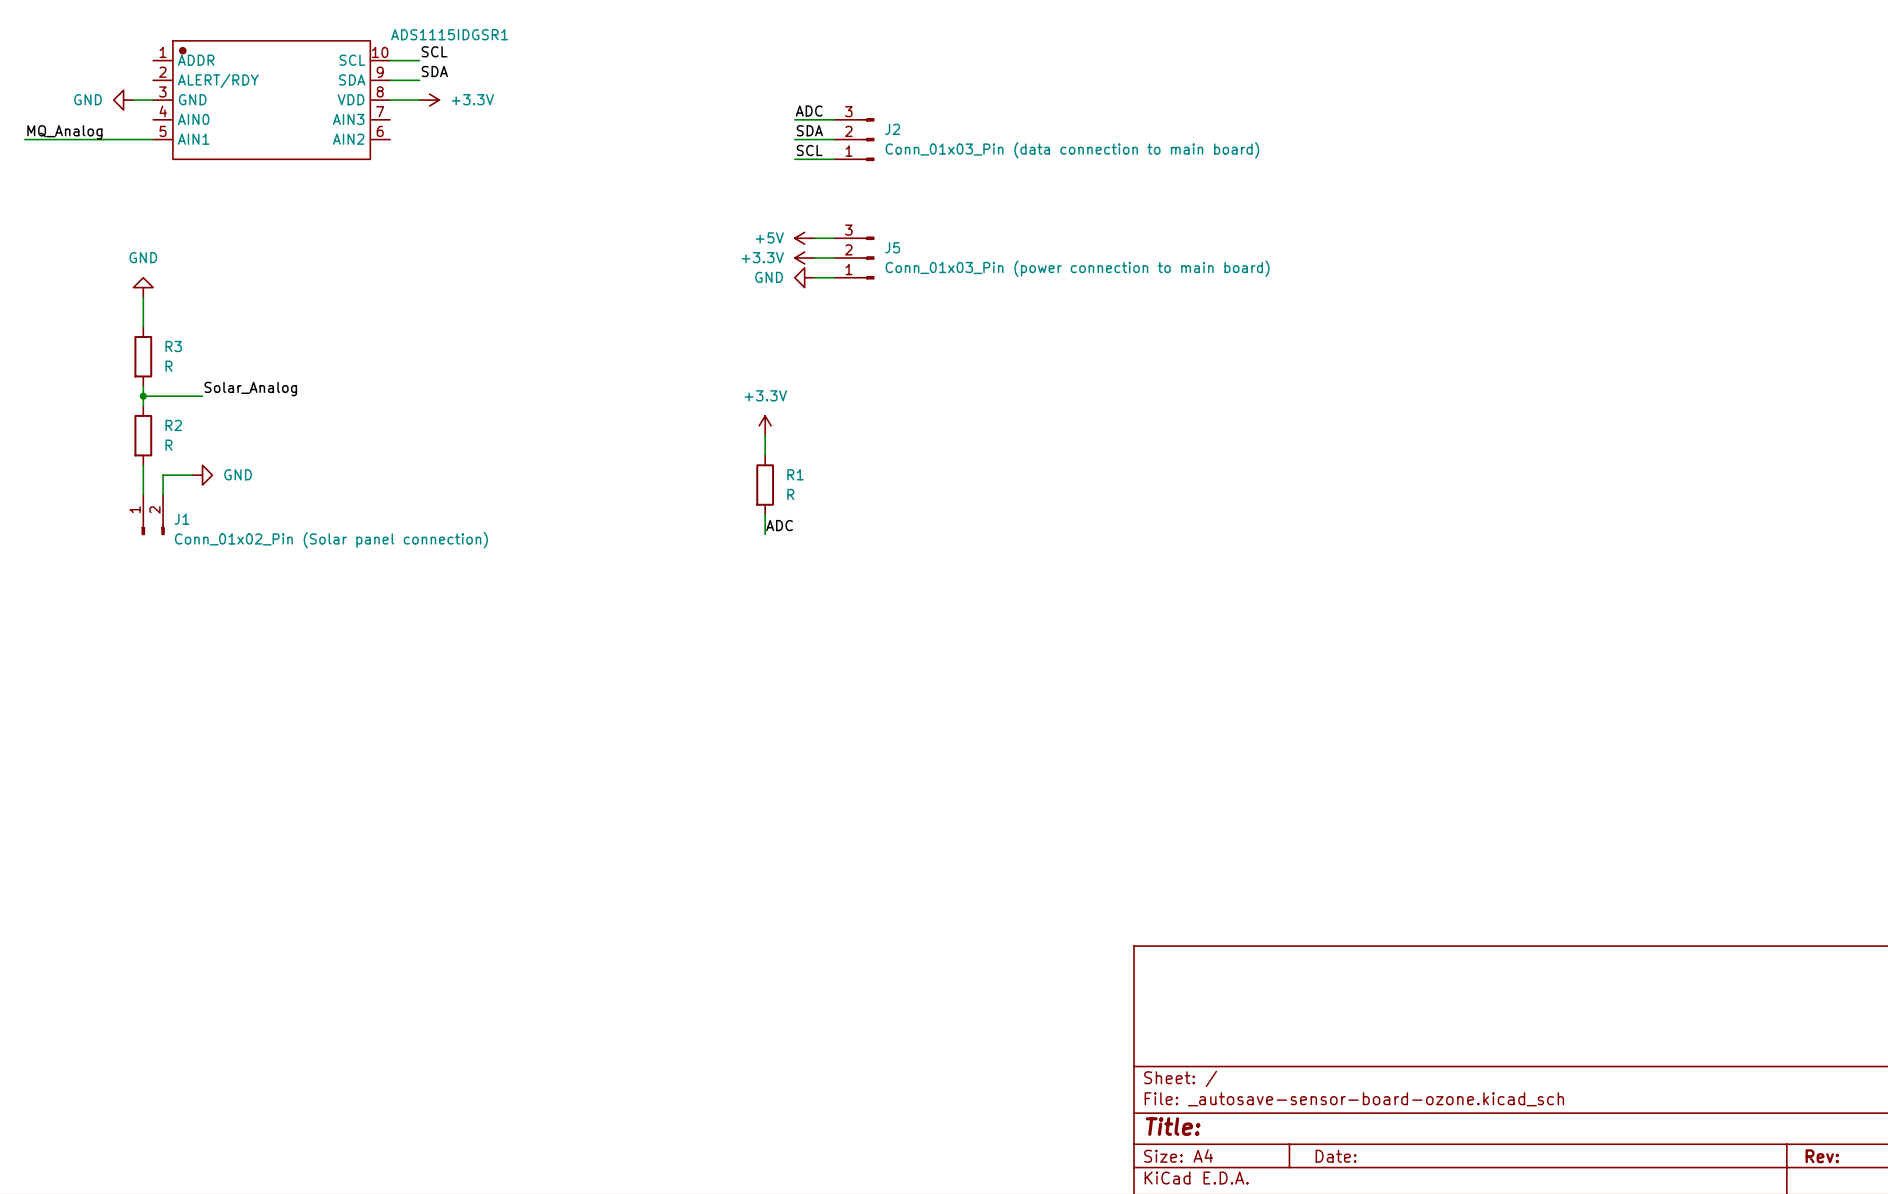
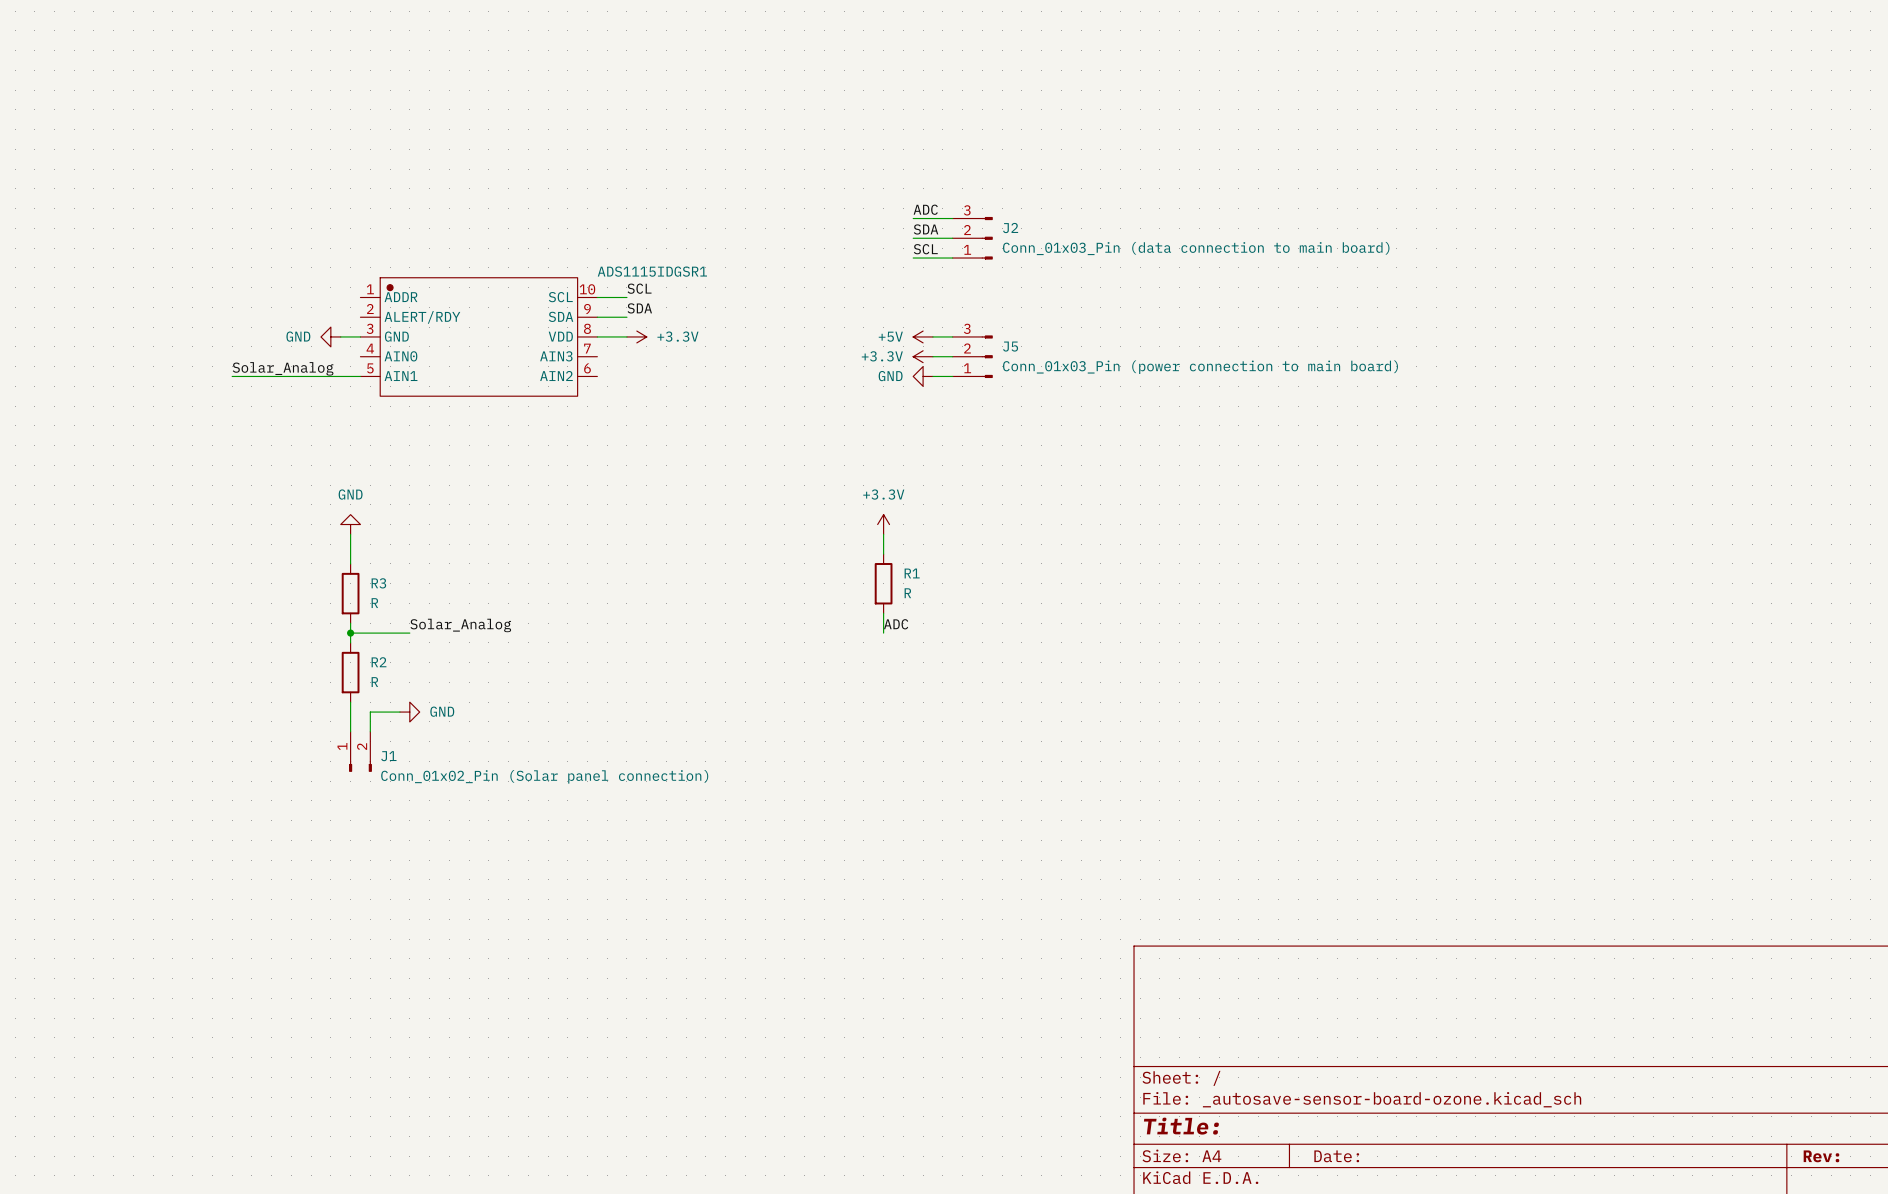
label: SCL (434, 51) -> none
wire: (390, 60) (419, 60) -> none
label: SDA (434, 71) -> none
wire: (390, 80) (419, 80) -> none
power symbol: GND (123, 100) -> none
wire: (133, 100) (153, 100) -> none
ADS1115IDGSR1 position: (271, 100) -> (478, 336)
wire: (390, 100) (419, 100) -> none
power symbol: +3.3V (429, 100) -> none
label position: ADC (809, 111) -> ADC (925, 209)
wire: (794, 119) (834, 119) -> (913, 218) (952, 218)
label: SDA (809, 130) -> none
label: MQ_Analog (64, 132) -> none
wire: (24, 139) (153, 139) -> none
wire: (794, 139) (834, 139) -> (913, 238) (952, 238)
J2 position: (854, 139) -> (972, 238)
label: SCL (809, 150) -> none
wire: (794, 159) (834, 159) -> (913, 258) (952, 258)
label: none -> SDA (926, 229)
power symbol position: +5V (804, 238) -> +5V (923, 336)
wire: (814, 238) (834, 238) -> (932, 336) (952, 336)
label: none -> SCL (925, 249)
power symbol: +3.3V (804, 258) -> none
wire: (814, 258) (834, 258) -> (932, 356) (952, 356)
J5 position: (854, 258) -> (972, 356)
power symbol position: GND (804, 277) -> GND (923, 376)
wire: (814, 277) (834, 277) -> (932, 376) (952, 376)
power symbol: GND (143, 287) -> none
label: none -> SCL (639, 288)
wire: (143, 297) (143, 327) -> none
wire: none -> (597, 297) (626, 297)
label: none -> SDA (639, 308)
wire: none -> (597, 317) (626, 317)
power symbol: none -> GND (330, 336)
wire: none -> (340, 336) (360, 336)
wire: none -> (597, 336) (626, 336)
power symbol: none -> +3.3V (636, 336)
R3 position: (143, 356) -> (350, 593)
power symbol: none -> +3.3V (923, 356)
wire: none -> (232, 376) (360, 376)
wire: (143, 386) (143, 406) -> none
label position: Solar_Analog (250, 389) -> Solar_Analog (283, 368)
wire: (143, 396) (202, 396) -> none
junction: (143, 396) -> none
power symbol: +3.3V (765, 425) -> none
R2 position: (143, 435) -> (350, 672)
wire: (765, 435) (765, 455) -> (883, 534) (883, 554)
wire: (143, 465) (143, 494) -> none
wire: (192, 475) (163, 475) (163, 494) -> none
power symbol: GND (202, 475) -> none
R1 position: (765, 485) -> (883, 583)
J1 position: (153, 514) -> (360, 751)
wire: (765, 514) (765, 534) -> (883, 613) (883, 633)
power symbol: none -> GND (350, 524)
power symbol: none -> +3.3V (883, 524)
label position: ADC (779, 525) -> ADC (896, 624)
wire: none -> (350, 534) (350, 563)
wire: none -> (350, 623) (350, 642)
label: none -> Solar_Analog (460, 625)
wire: none -> (350, 633) (409, 633)
junction: none -> (350, 633)
wire: none -> (350, 702) (350, 731)
wire: none -> (399, 712) (370, 712) (370, 731)
power symbol: none -> GND (409, 712)

